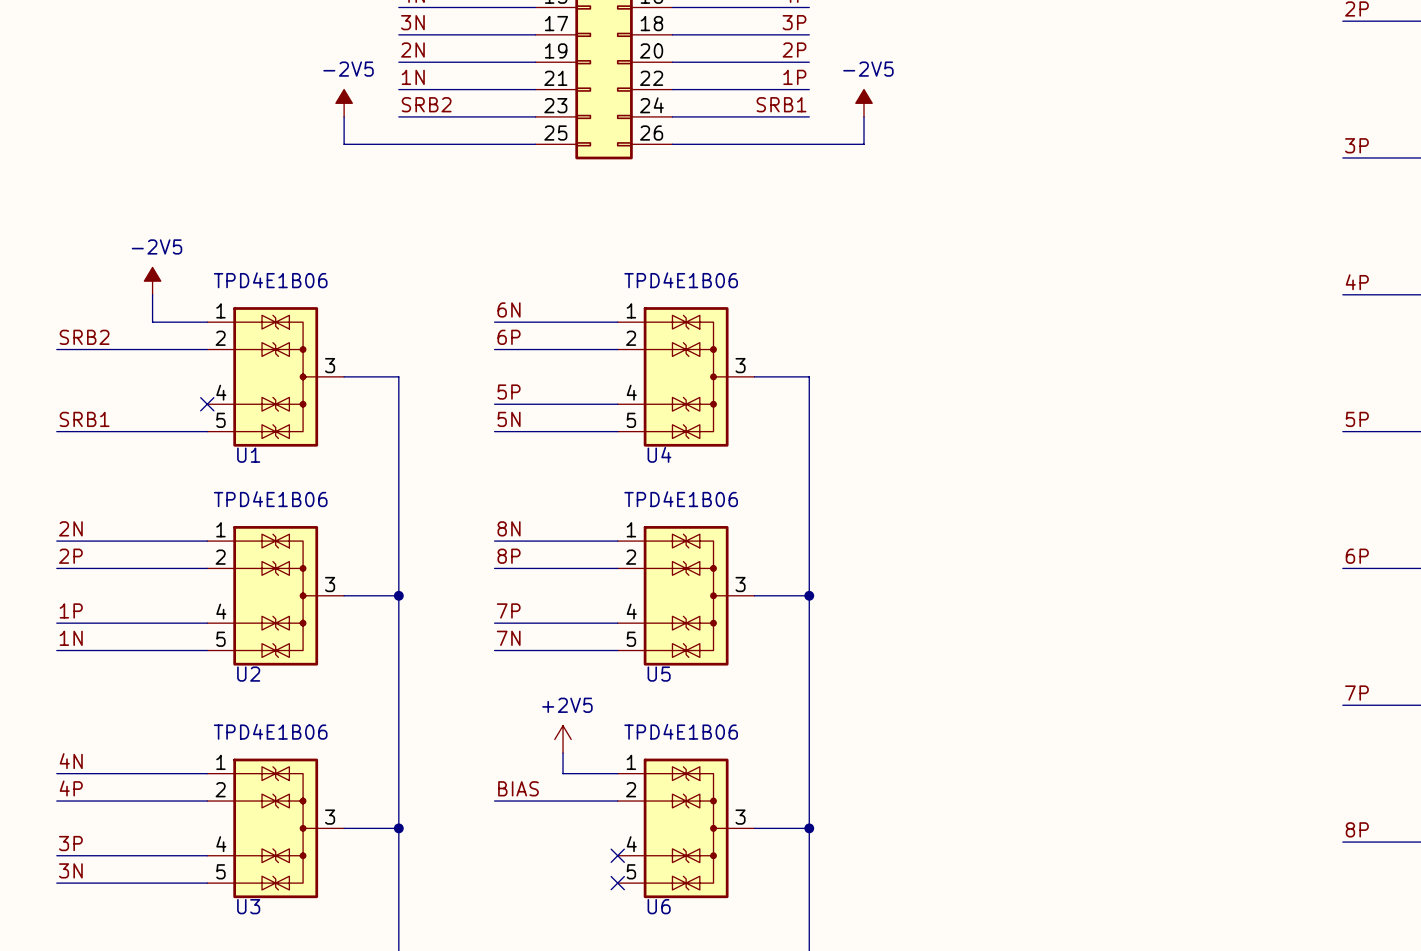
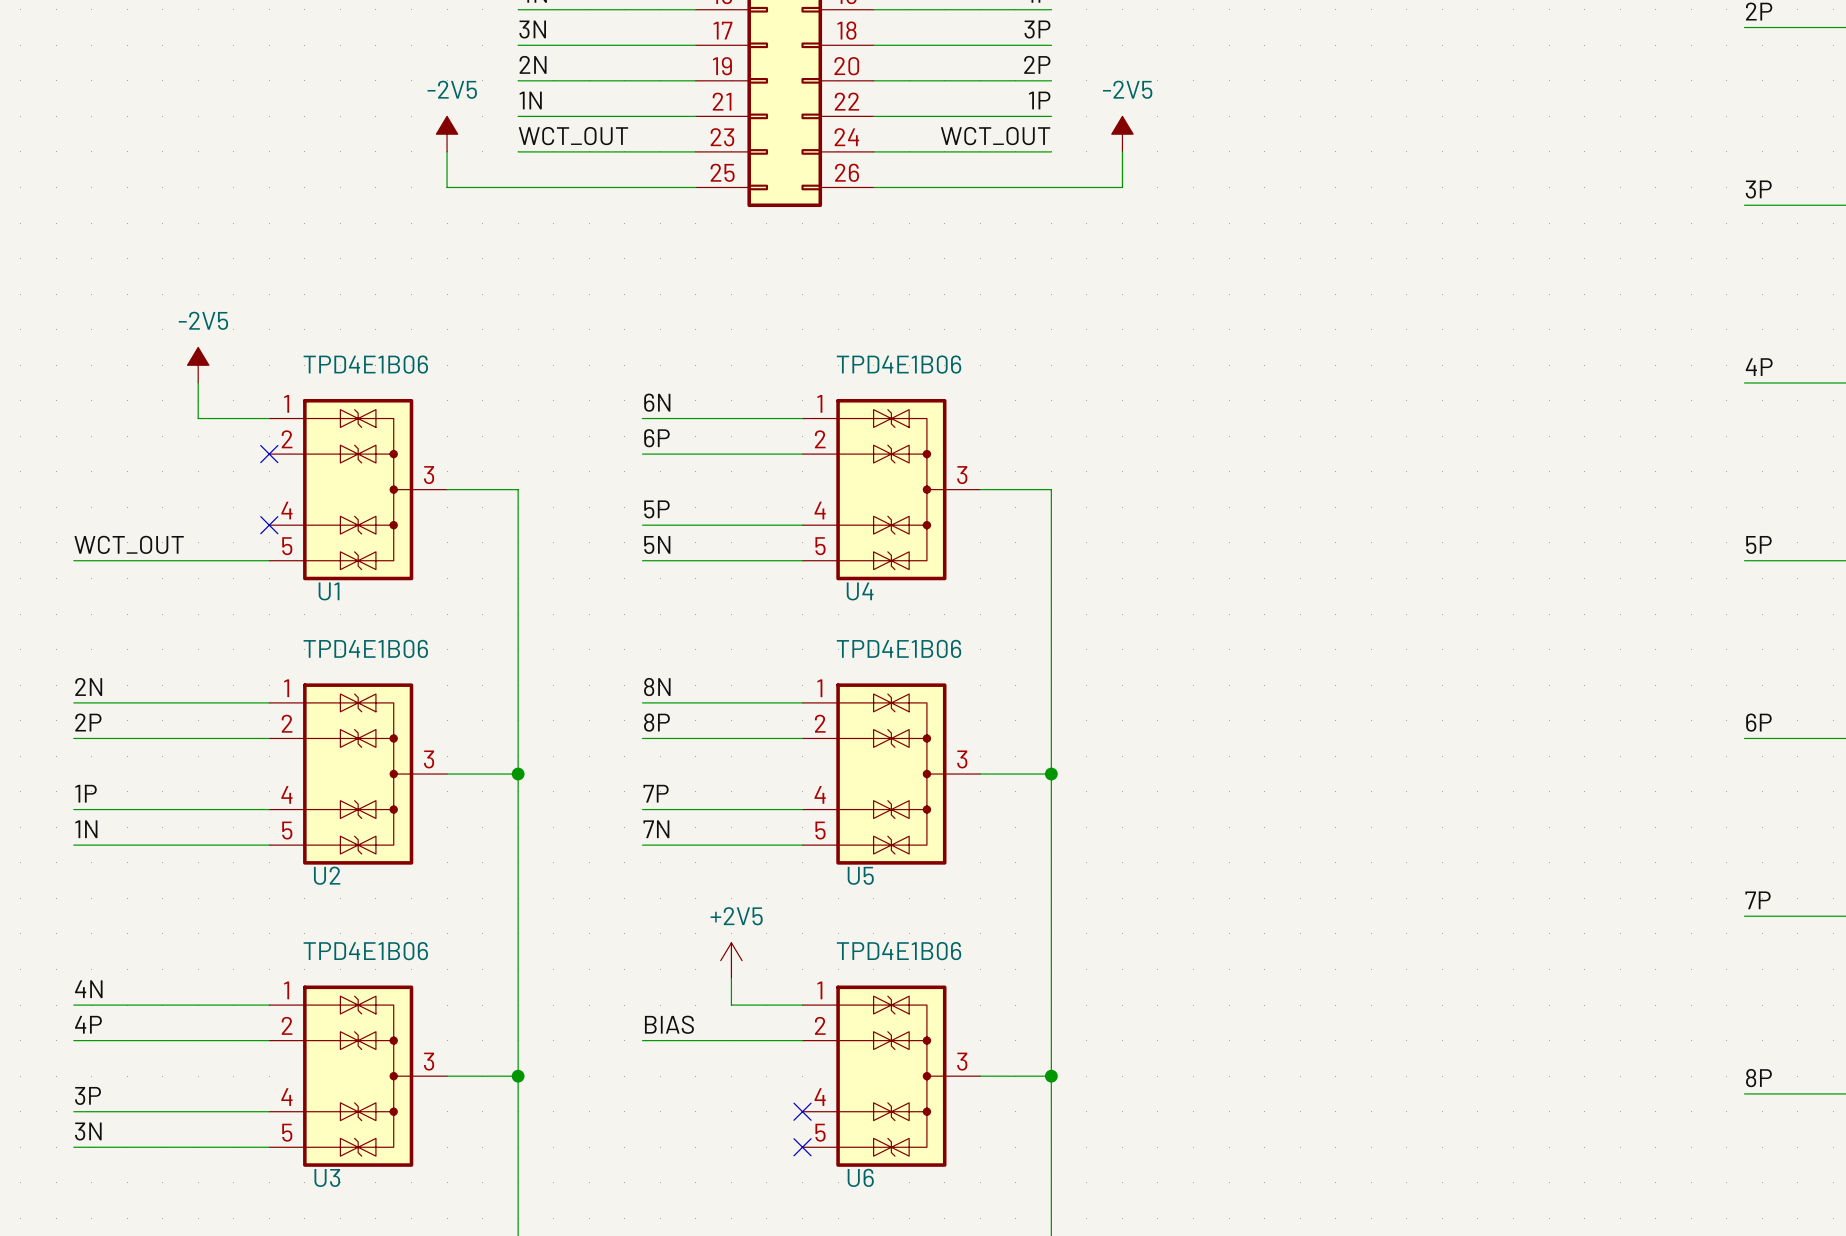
label: SRB2 (426, 104) -> WCT_OUT (573, 136)
label: SRB1 (781, 104) -> WCT_OUT (995, 136)
label: SRB2 (84, 337) -> none
wire: (56, 349) (207, 349) -> none
no-connect mark: none -> (269, 454)
label: SRB1 (84, 419) -> WCT_OUT (129, 544)

